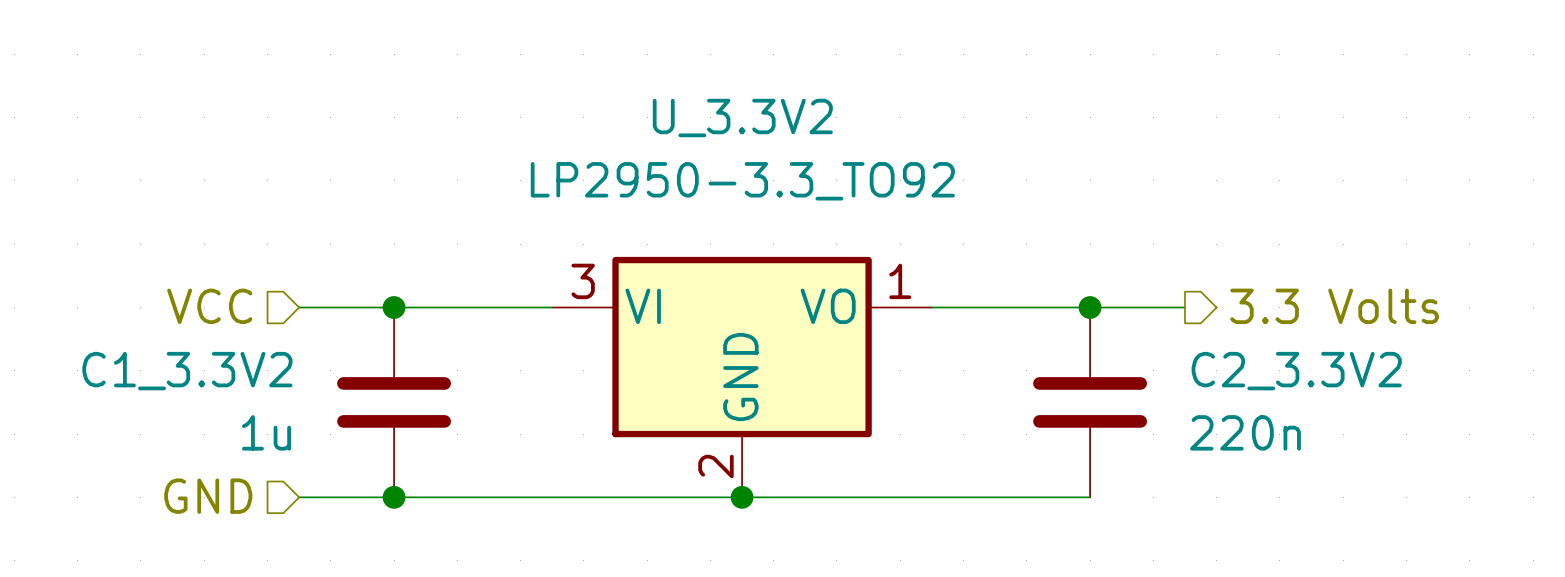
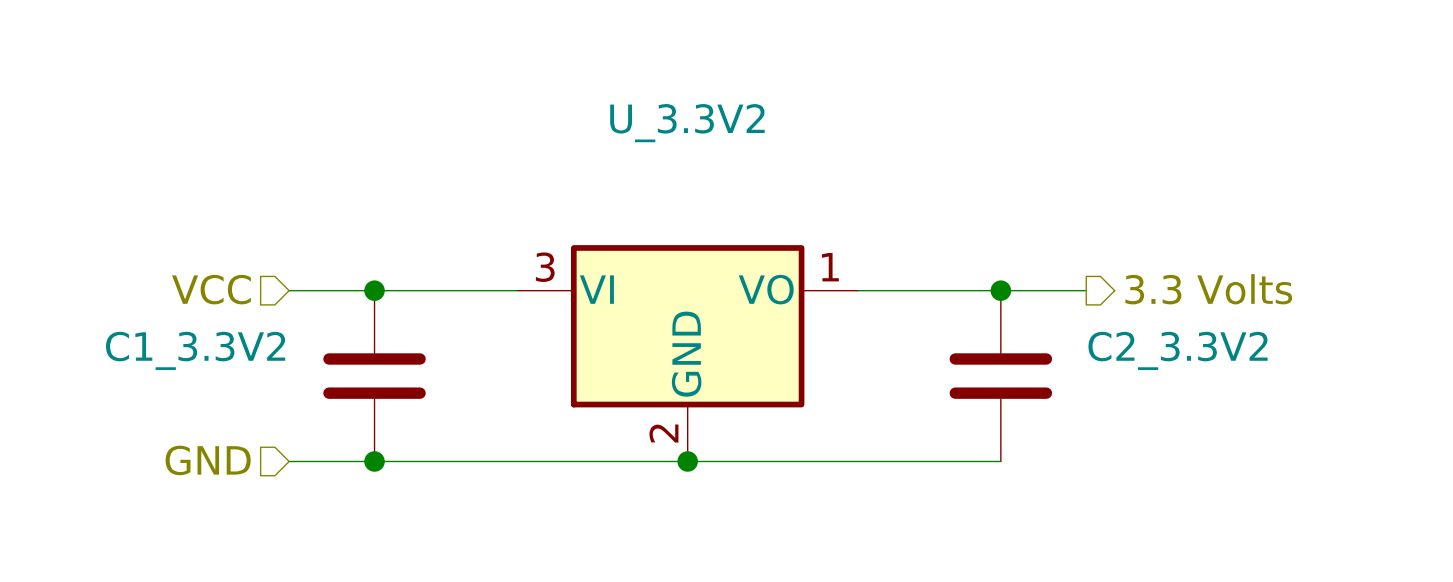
U_3.3V2 value: LP2950-3.3_TO92 (742, 181) -> none
C1_3.3V2 value: 1u (266, 432) -> none
C2_3.3V2 value: 220n (1245, 432) -> none

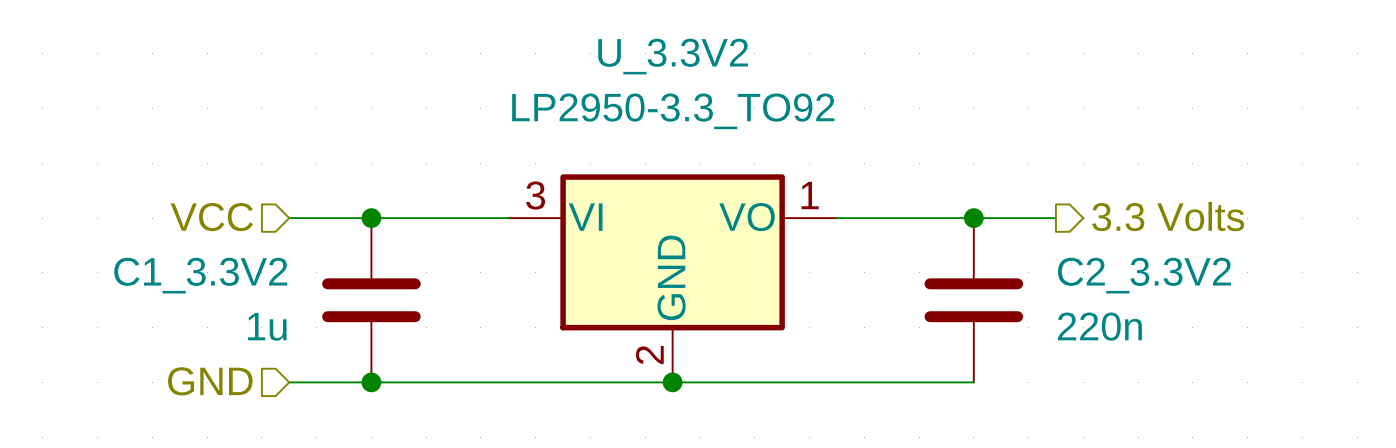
U_3.3V2 value: none -> LP2950-3.3_TO92 (673, 111)
C1_3.3V2 value: none -> 1u (267, 326)
C2_3.3V2 value: none -> 220n (1099, 326)

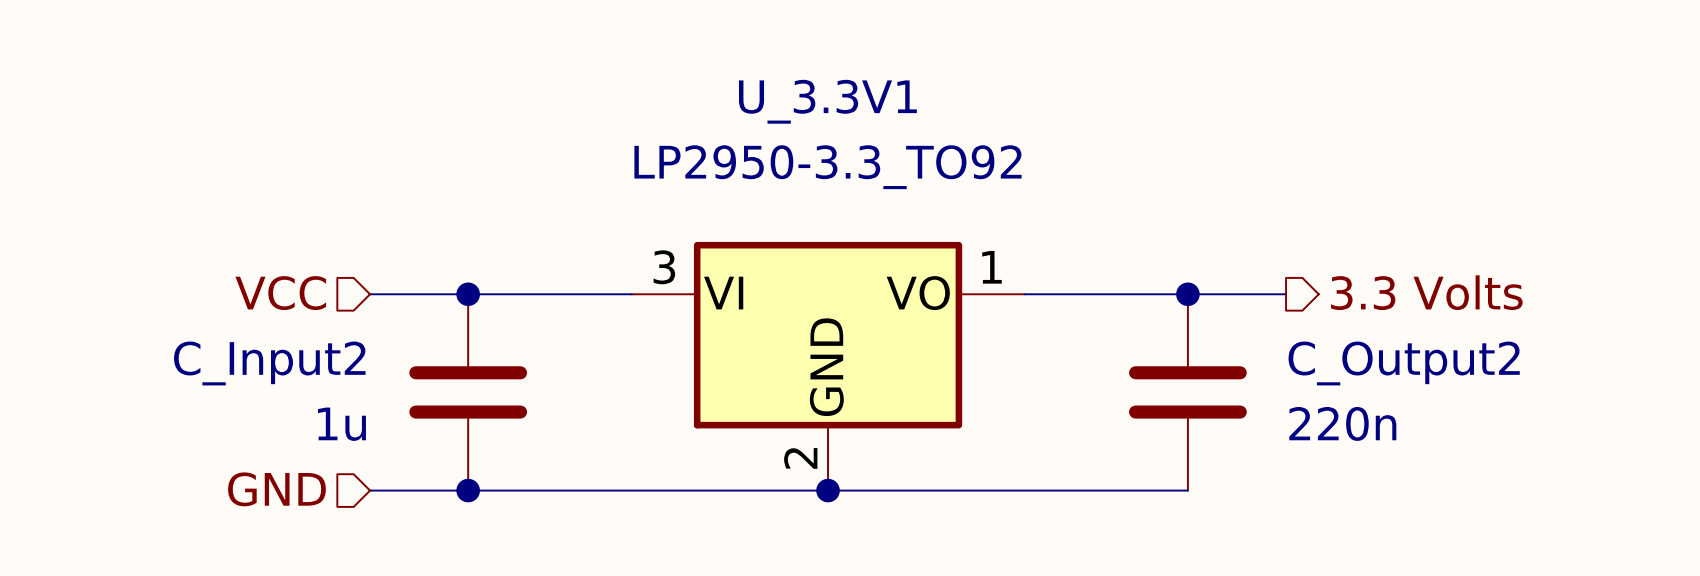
U_3.3V2 name: U_3.3V2 (673, 56) -> U_3.3V1 (827, 101)
C1_3.3V2 name: C1_3.3V2 (200, 275) -> C_Input2 (269, 363)
C2_3.3V2 name: C2_3.3V2 (1144, 275) -> C_Output2 (1404, 363)

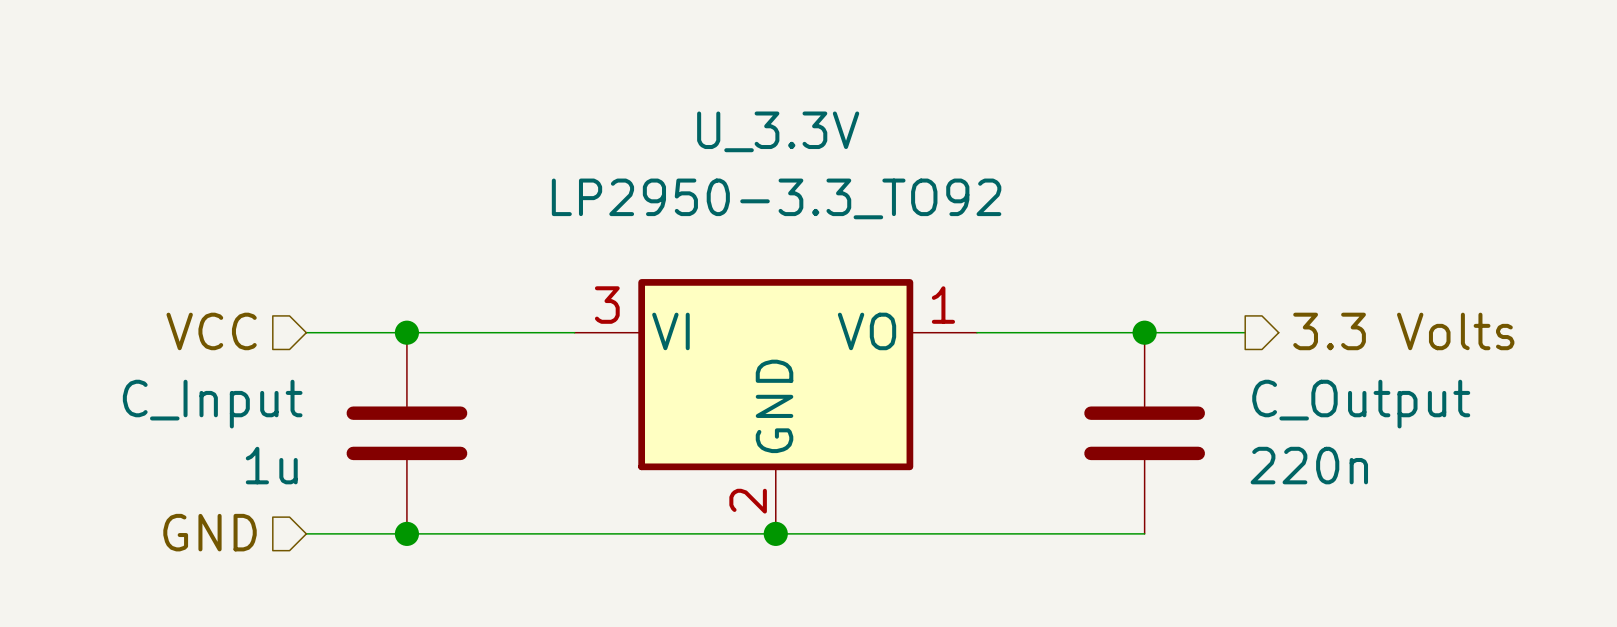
U_3.3V1 name: U_3.3V1 (827, 101) -> U_3.3V (778, 131)
C_Input2 name: C_Input2 (269, 363) -> C_Input (212, 404)
C_Output2 name: C_Output2 (1404, 363) -> C_Output (1361, 404)

